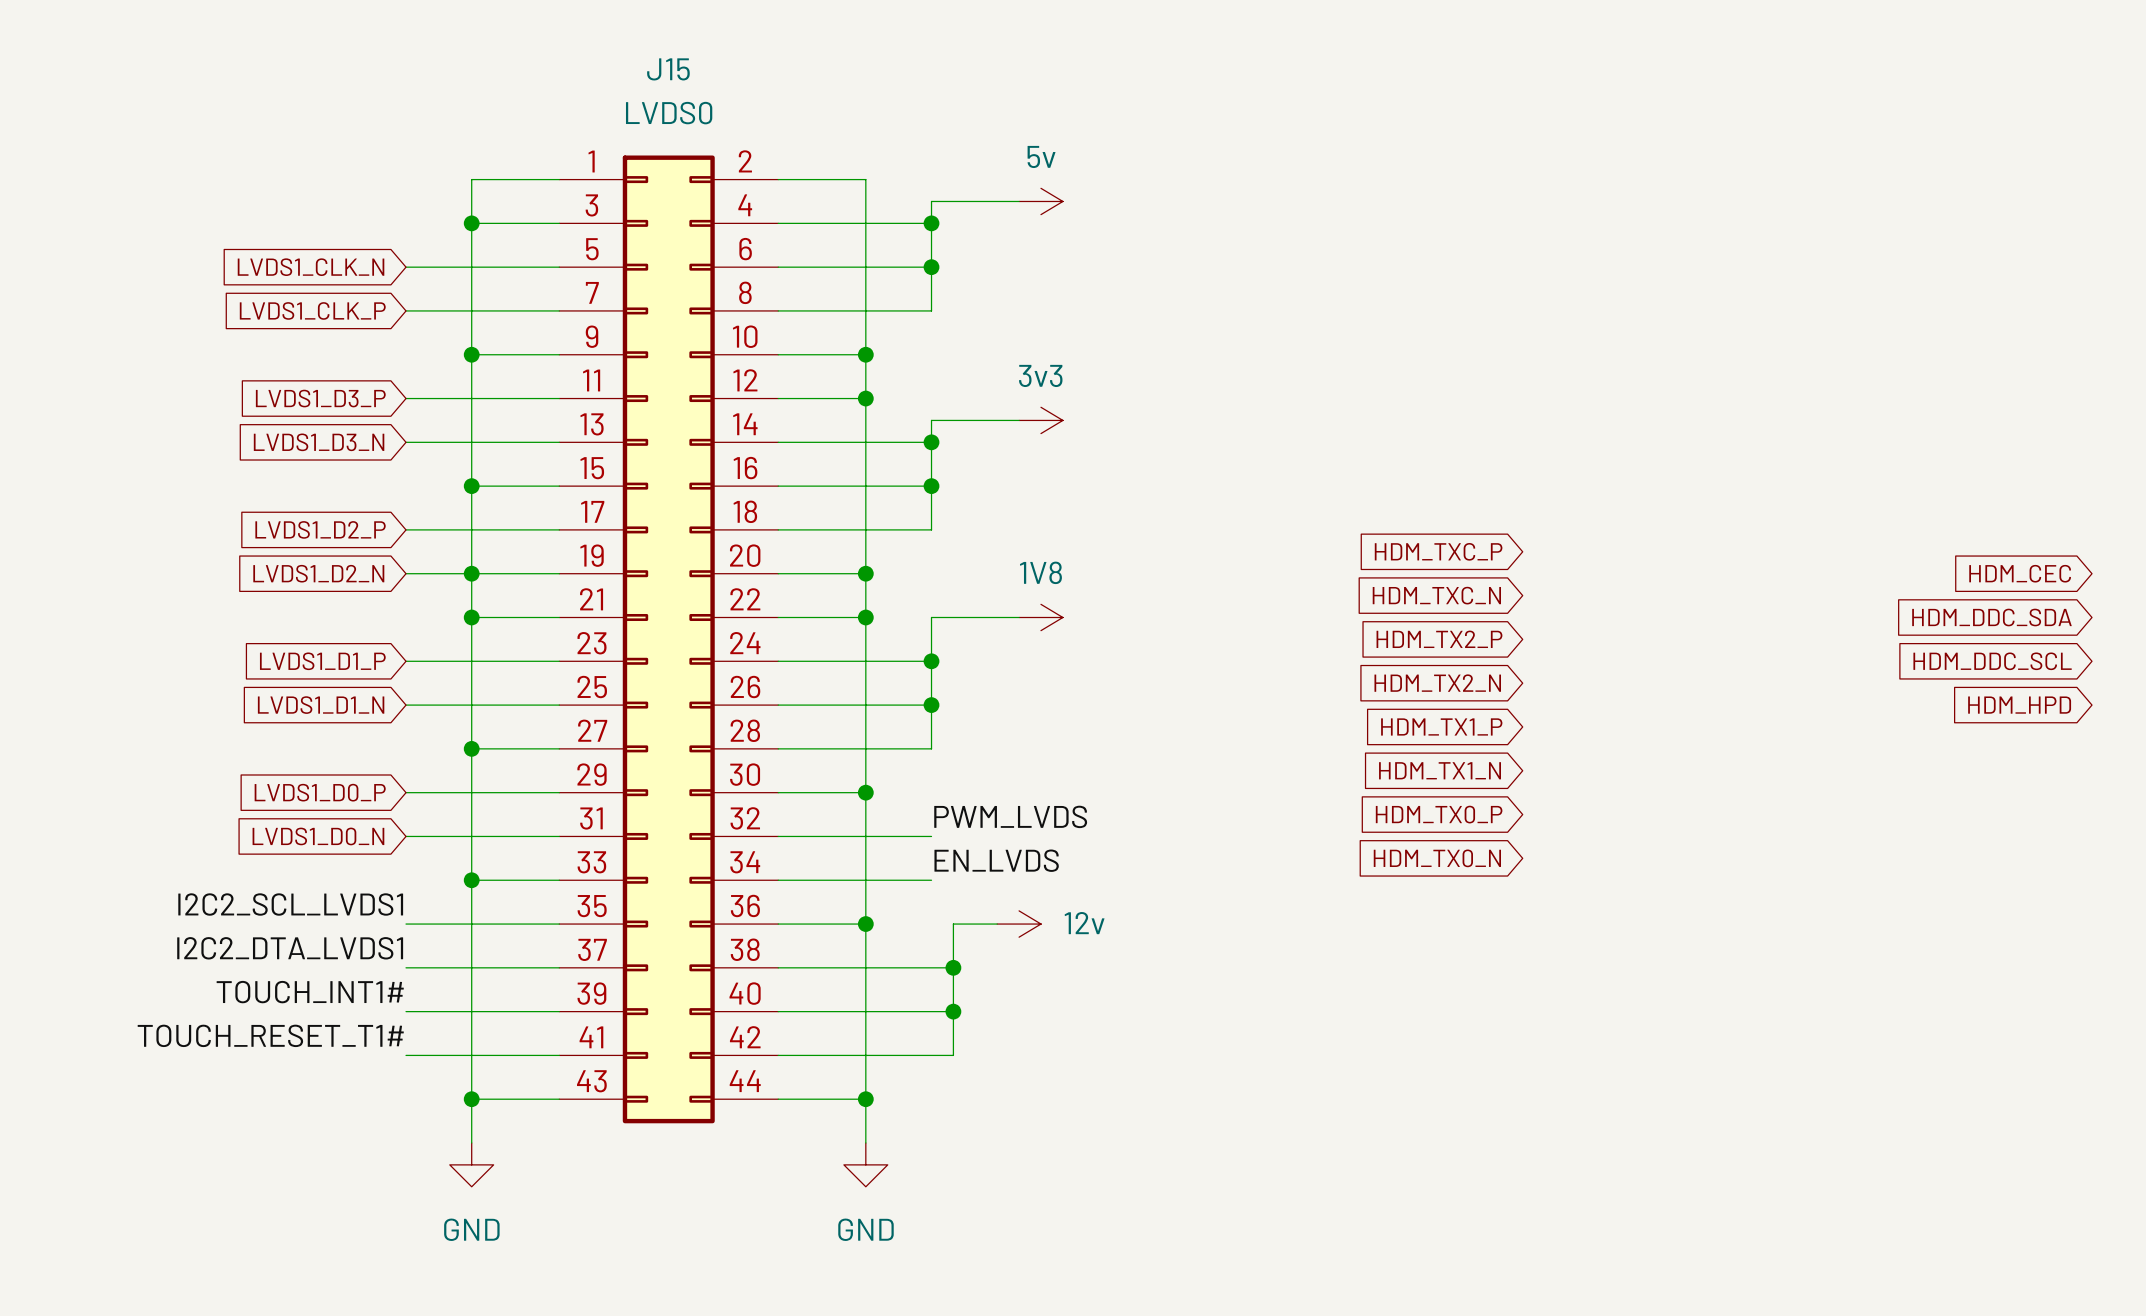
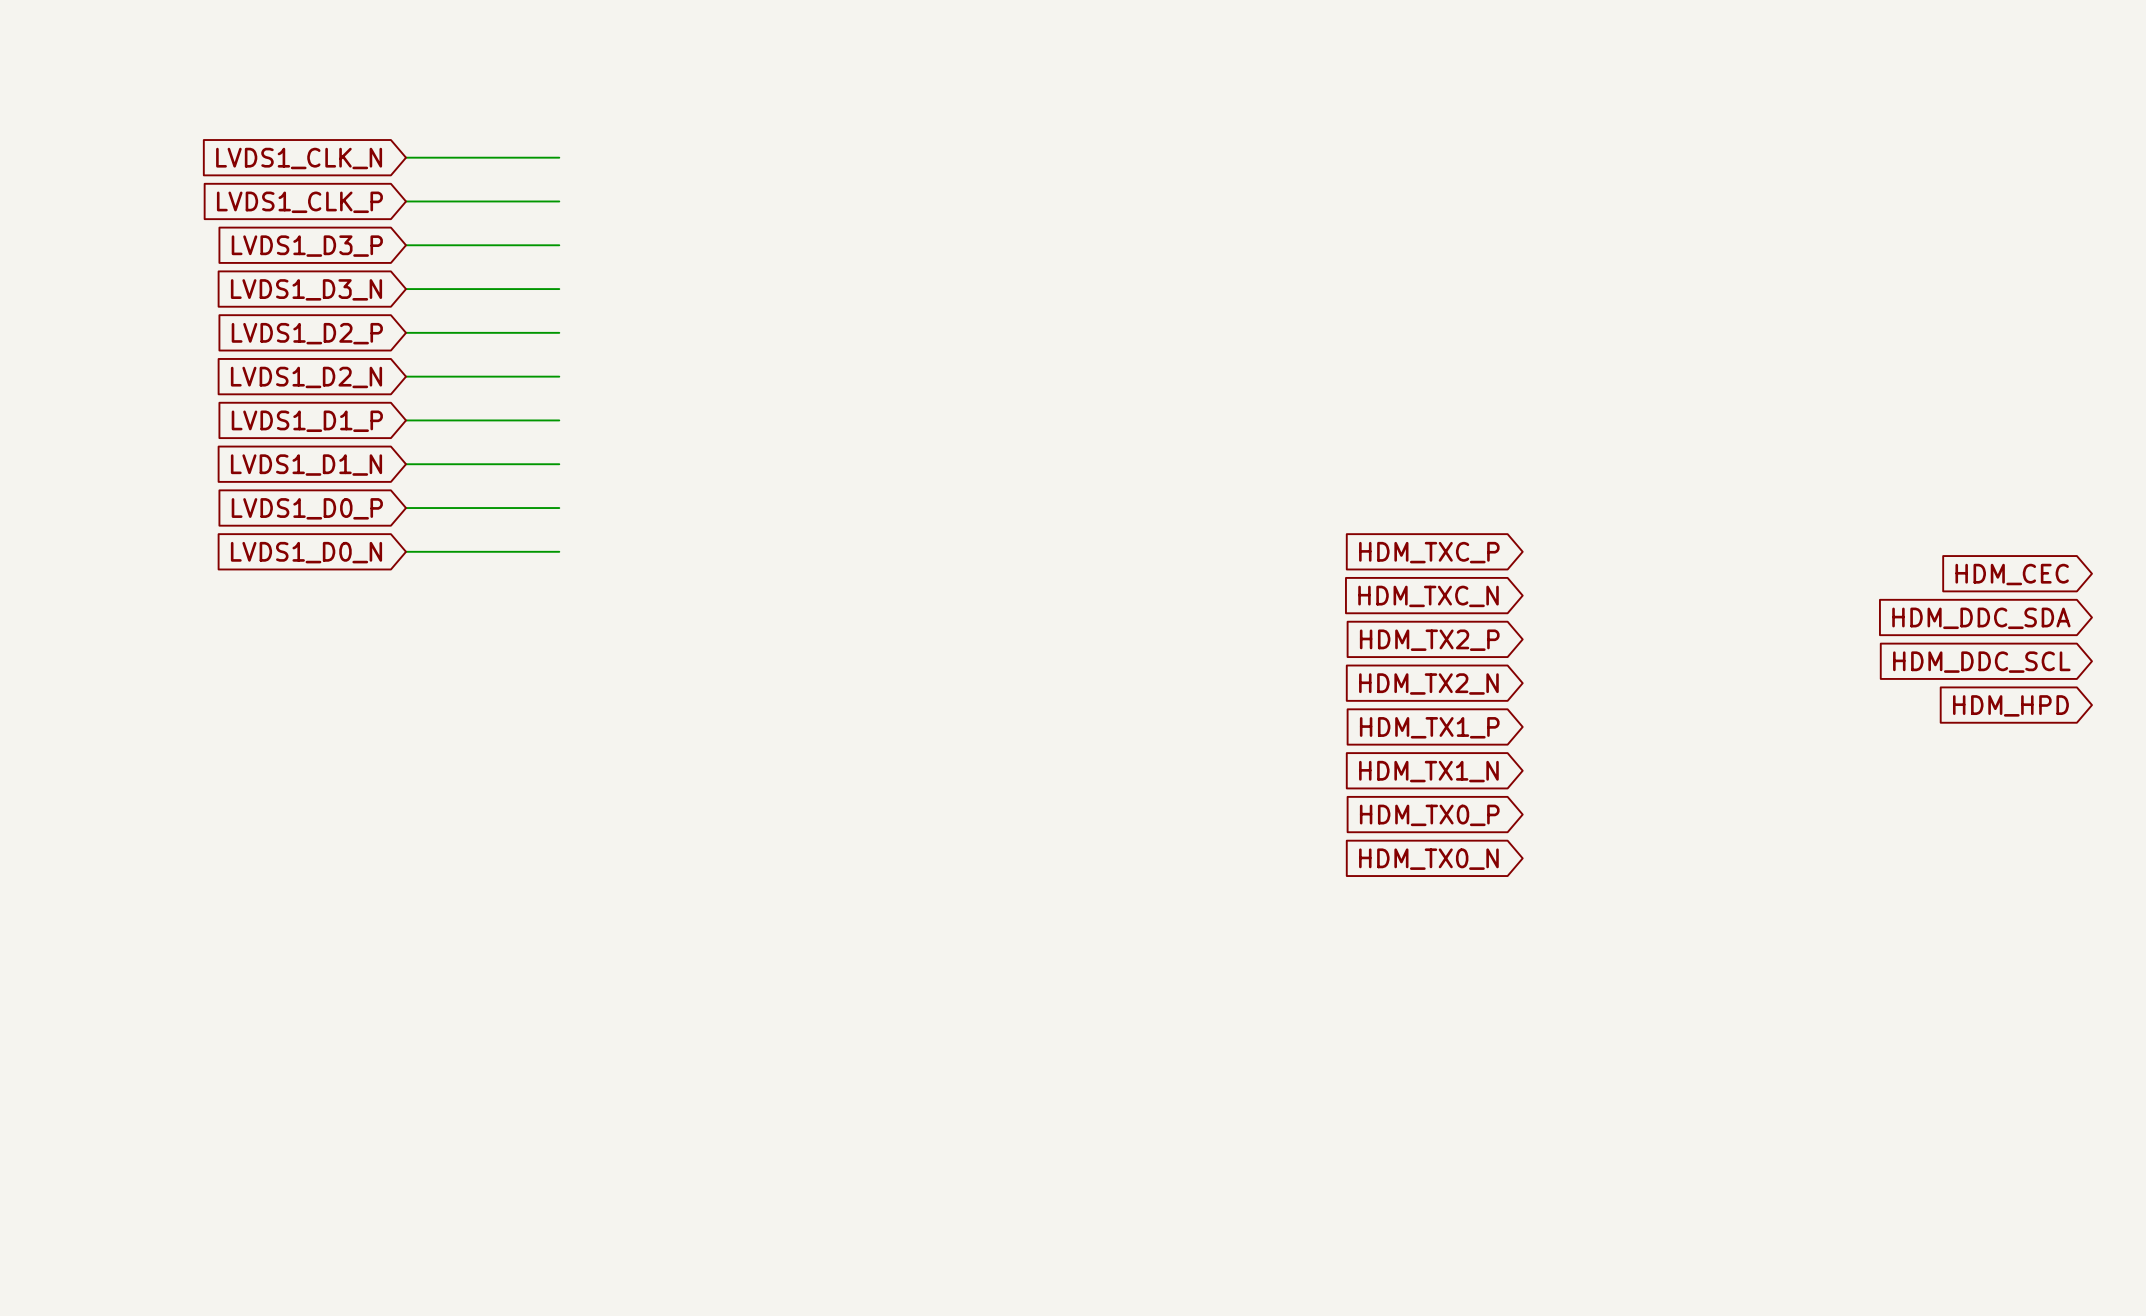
wire: (559, 179) (471, 179) (471, 1143) -> none
wire: (778, 179) (865, 179) (865, 1143) -> none
wire: (1019, 201) (931, 201) (931, 310) (778, 310) -> none
power symbol: 5v (1040, 201) -> none
wire: (471, 223) (559, 223) -> none
junction: (471, 223) -> none
wire: (778, 223) (931, 223) -> (406, 245) (559, 245)
junction: (931, 223) -> none
global label position: LVDS1_CLK_N (311, 267) -> LVDS1_CLK_N (299, 158)
wire: (406, 267) (559, 267) -> (406, 157) (559, 157)
wire: (778, 267) (931, 267) -> none
junction: (931, 267) -> none
global label position: LVDS1_CLK_P (312, 310) -> LVDS1_CLK_P (299, 202)
wire: (406, 310) (559, 310) -> (406, 201) (559, 201)
wire: (471, 354) (559, 354) -> none
junction: (471, 354) -> none
wire: (778, 354) (865, 354) -> none
junction: (865, 354) -> none
global label position: LVDS1_D3_P (320, 398) -> LVDS1_D3_P (307, 246)
wire: (406, 398) (559, 398) -> (406, 289) (559, 289)
wire: (778, 398) (865, 398) -> none
junction: (865, 398) -> none
wire: (1019, 420) (931, 420) (931, 529) (778, 529) -> none
power symbol: 3v3 (1040, 420) -> none
global label position: LVDS1_D3_N (319, 442) -> LVDS1_D3_N (306, 289)
wire: (406, 442) (559, 442) -> (406, 332) (559, 332)
wire: (778, 442) (931, 442) -> none
junction: (931, 442) -> none
wire: (471, 486) (559, 486) -> none
junction: (471, 486) -> none
wire: (778, 486) (931, 486) -> none
junction: (931, 486) -> none
global label position: LVDS1_D2_P (320, 529) -> LVDS1_D2_P (307, 333)
wire: (406, 529) (559, 529) -> (406, 420) (559, 420)
global label position: LVDS1_D2_N (318, 573) -> LVDS1_D2_N (306, 377)
wire: (406, 573) (559, 573) -> (406, 464) (559, 464)
junction: (471, 573) -> none
wire: (778, 573) (865, 573) -> none
junction: (865, 573) -> none
wire: (471, 617) (559, 617) -> none
junction: (471, 617) -> none
wire: (778, 617) (865, 617) -> none
junction: (865, 617) -> none
wire: (1019, 617) (931, 617) (931, 748) (778, 748) -> none
power symbol: 1V8 (1040, 617) -> none
J15: LVDS0 (668, 639) -> none
global label position: LVDS1_D1_P (322, 661) -> LVDS1_D1_P (307, 421)
wire: (406, 661) (559, 661) -> (406, 551) (559, 551)
wire: (778, 661) (931, 661) -> none
junction: (931, 661) -> none
global label position: LVDS1_D1_N (321, 705) -> LVDS1_D1_N (306, 465)
wire: (406, 705) (559, 705) -> (406, 376) (559, 376)
wire: (778, 705) (931, 705) -> none
junction: (931, 705) -> none
wire: (471, 748) (559, 748) -> none
junction: (471, 748) -> none
global label position: LVDS1_D0_P (320, 792) -> LVDS1_D0_P (307, 508)
wire: (406, 792) (559, 792) -> (406, 508) (559, 508)
wire: (778, 792) (865, 792) -> none
junction: (865, 792) -> none
label: PWM_LVDS (1010, 816) -> none
global label position: LVDS1_D0_N (318, 836) -> LVDS1_D0_N (306, 552)
wire: (406, 836) (559, 836) -> none
wire: (778, 836) (931, 836) -> none
label: EN_LVDS (996, 860) -> none
wire: (471, 880) (559, 880) -> none
junction: (471, 880) -> none
wire: (778, 880) (931, 880) -> none
label: I2C2_SCL_LVDS1 (290, 904) -> none
wire: (406, 924) (559, 924) -> none
wire: (778, 924) (865, 924) -> none
junction: (865, 924) -> none
wire: (997, 924) (953, 924) (953, 1055) (778, 1055) -> none
power symbol: 12v (1019, 924) -> none
label: I2C2_DTA_LVDS1 (290, 948) -> none
wire: (406, 967) (559, 967) -> none
wire: (778, 967) (953, 967) -> none
junction: (953, 967) -> none
label: TOUCH_INT1# (310, 992) -> none
wire: (406, 1011) (559, 1011) -> none
wire: (778, 1011) (953, 1011) -> none
junction: (953, 1011) -> none
label: TOUCH_RESET_T1# (270, 1035) -> none
wire: (406, 1055) (559, 1055) -> none
wire: (471, 1099) (559, 1099) -> none
junction: (471, 1099) -> none
wire: (778, 1099) (865, 1099) -> none
junction: (865, 1099) -> none
power symbol: GND (471, 1164) -> none
power symbol: GND (865, 1164) -> none

